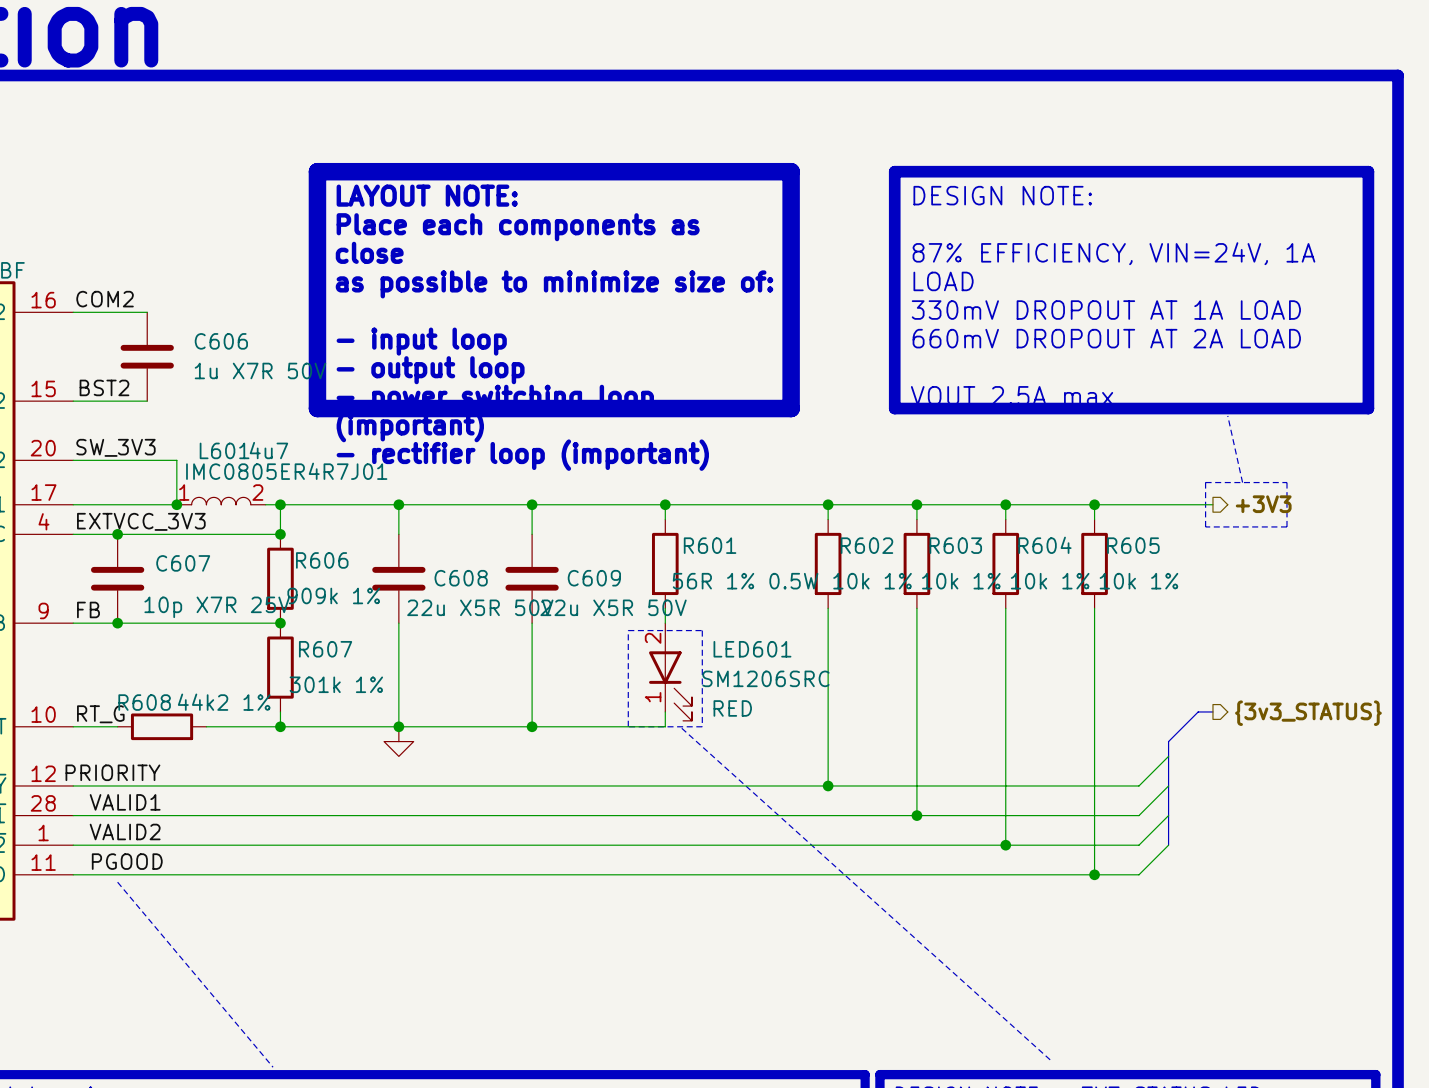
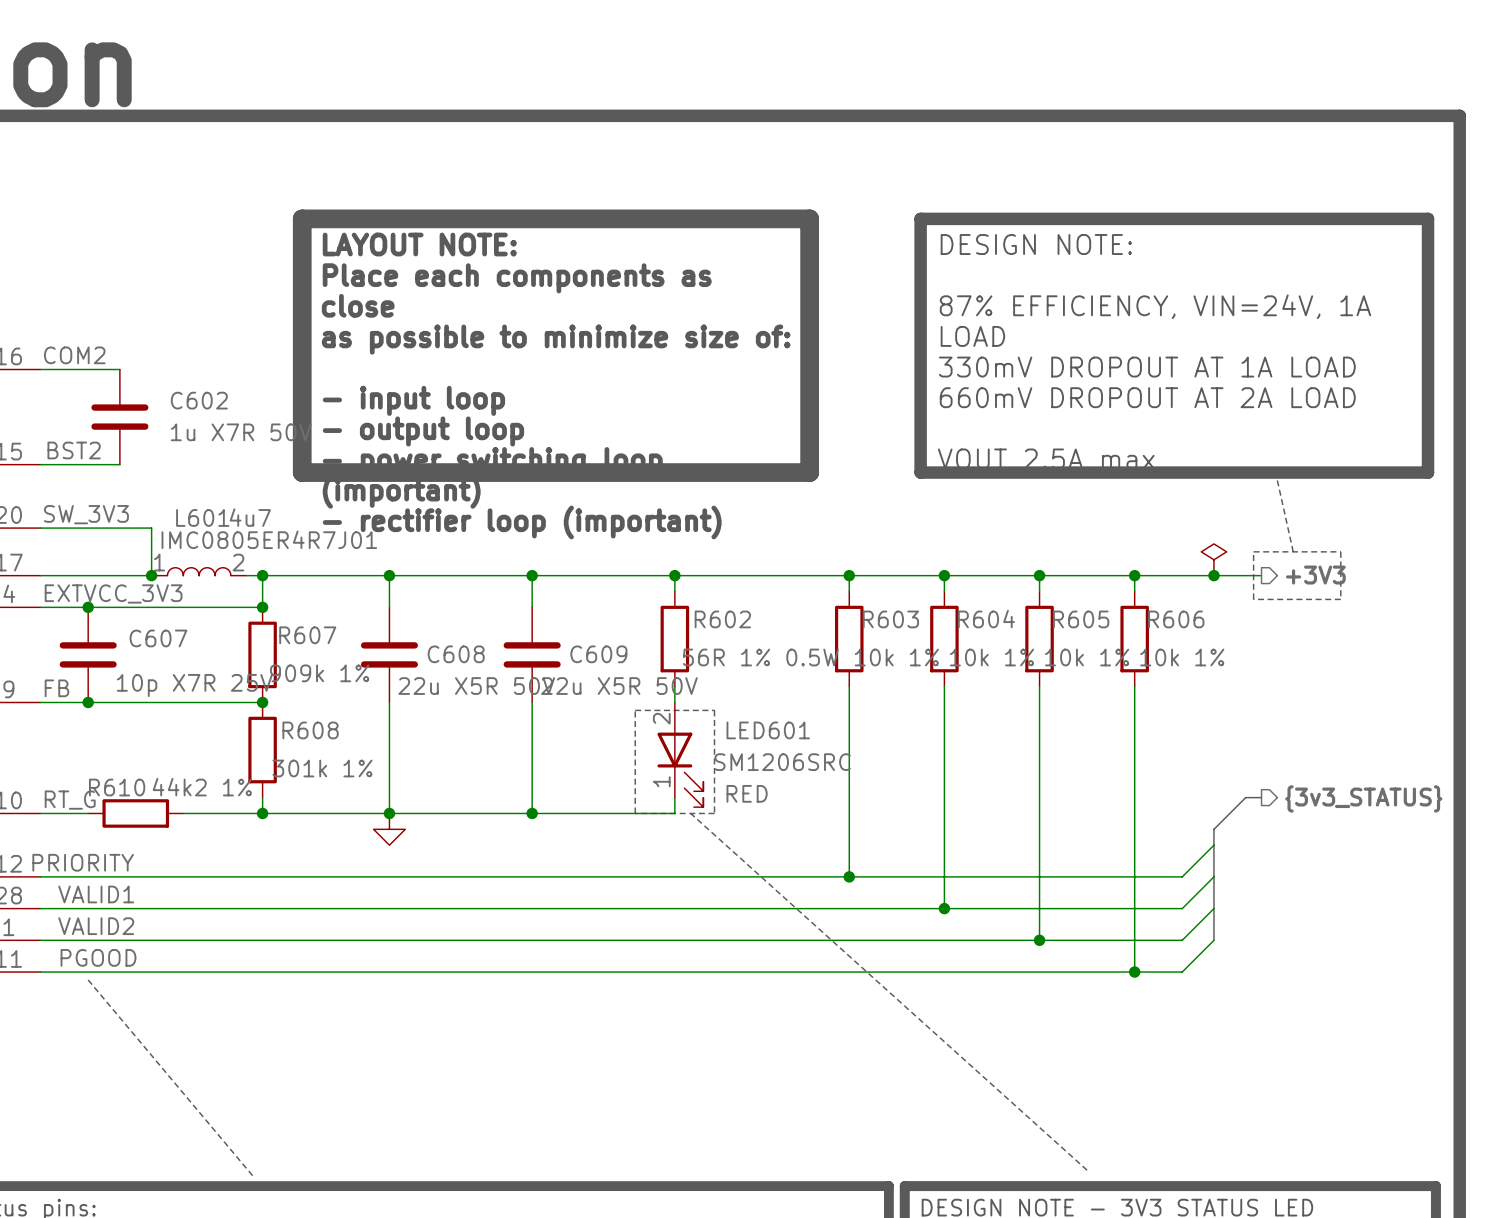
C606 name: C606 (221, 341) -> C602 (199, 400)
power symbol: none -> (1213, 559)
junction: none -> (1213, 575)
R601 name: R601 (710, 545) -> R602 (722, 619)
R602 name: R602 (866, 545) -> R603 (890, 619)
R603 name: R603 (955, 545) -> R604 (986, 619)
R604 name: R604 (1044, 545) -> R605 (1081, 619)
R605 name: R605 (1133, 545) -> R606 (1176, 619)
R606 name: R606 (322, 560) -> R607 (307, 635)
R607 name: R607 (325, 649) -> R608 (310, 730)
R608 name: R608 (144, 702) -> R610 (117, 787)

